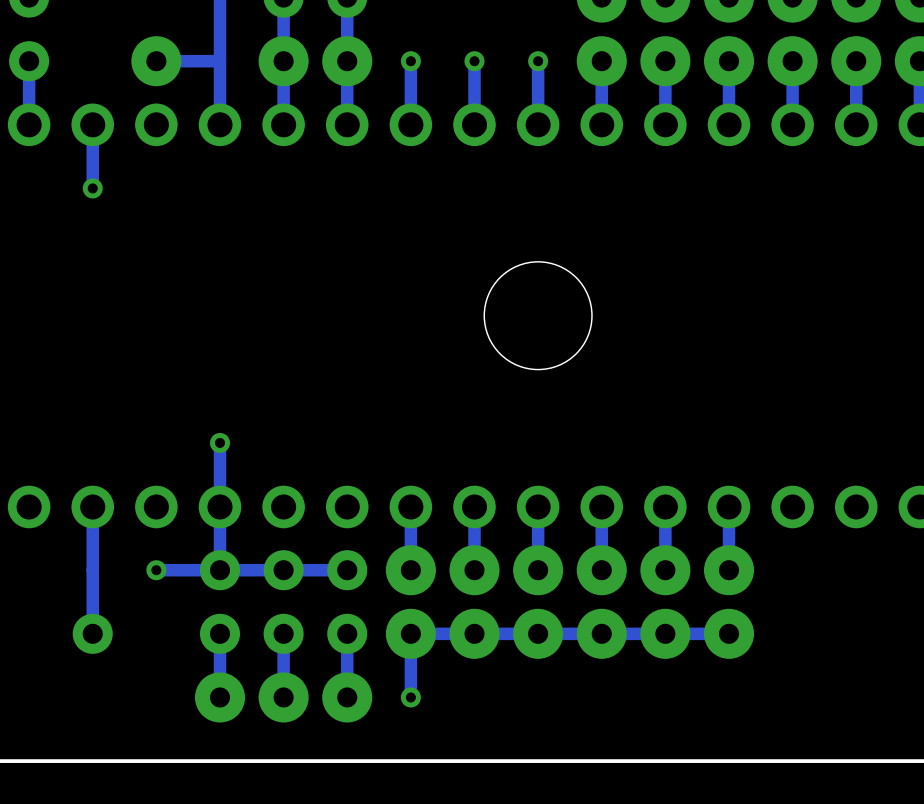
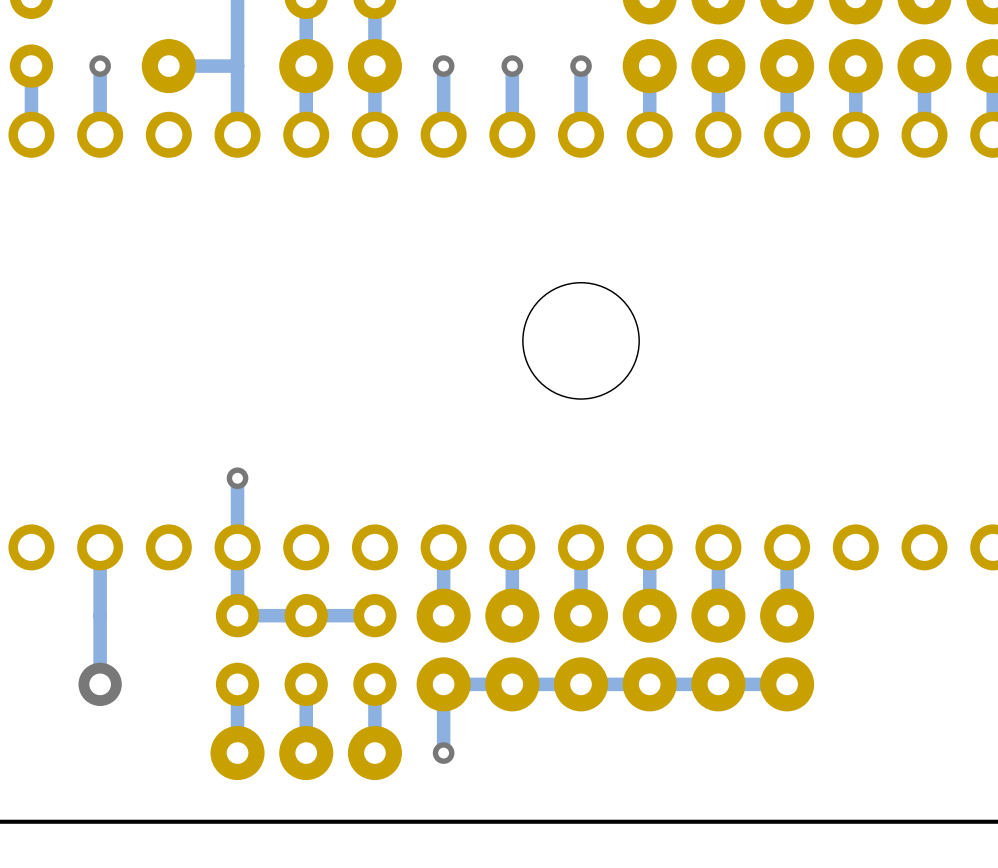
track: (92, 124) (92, 188) -> (100, 134) (100, 66)
via position: (92, 188) -> (100, 66)
via: (156, 570) -> none
track: (220, 570) (156, 570) -> none

